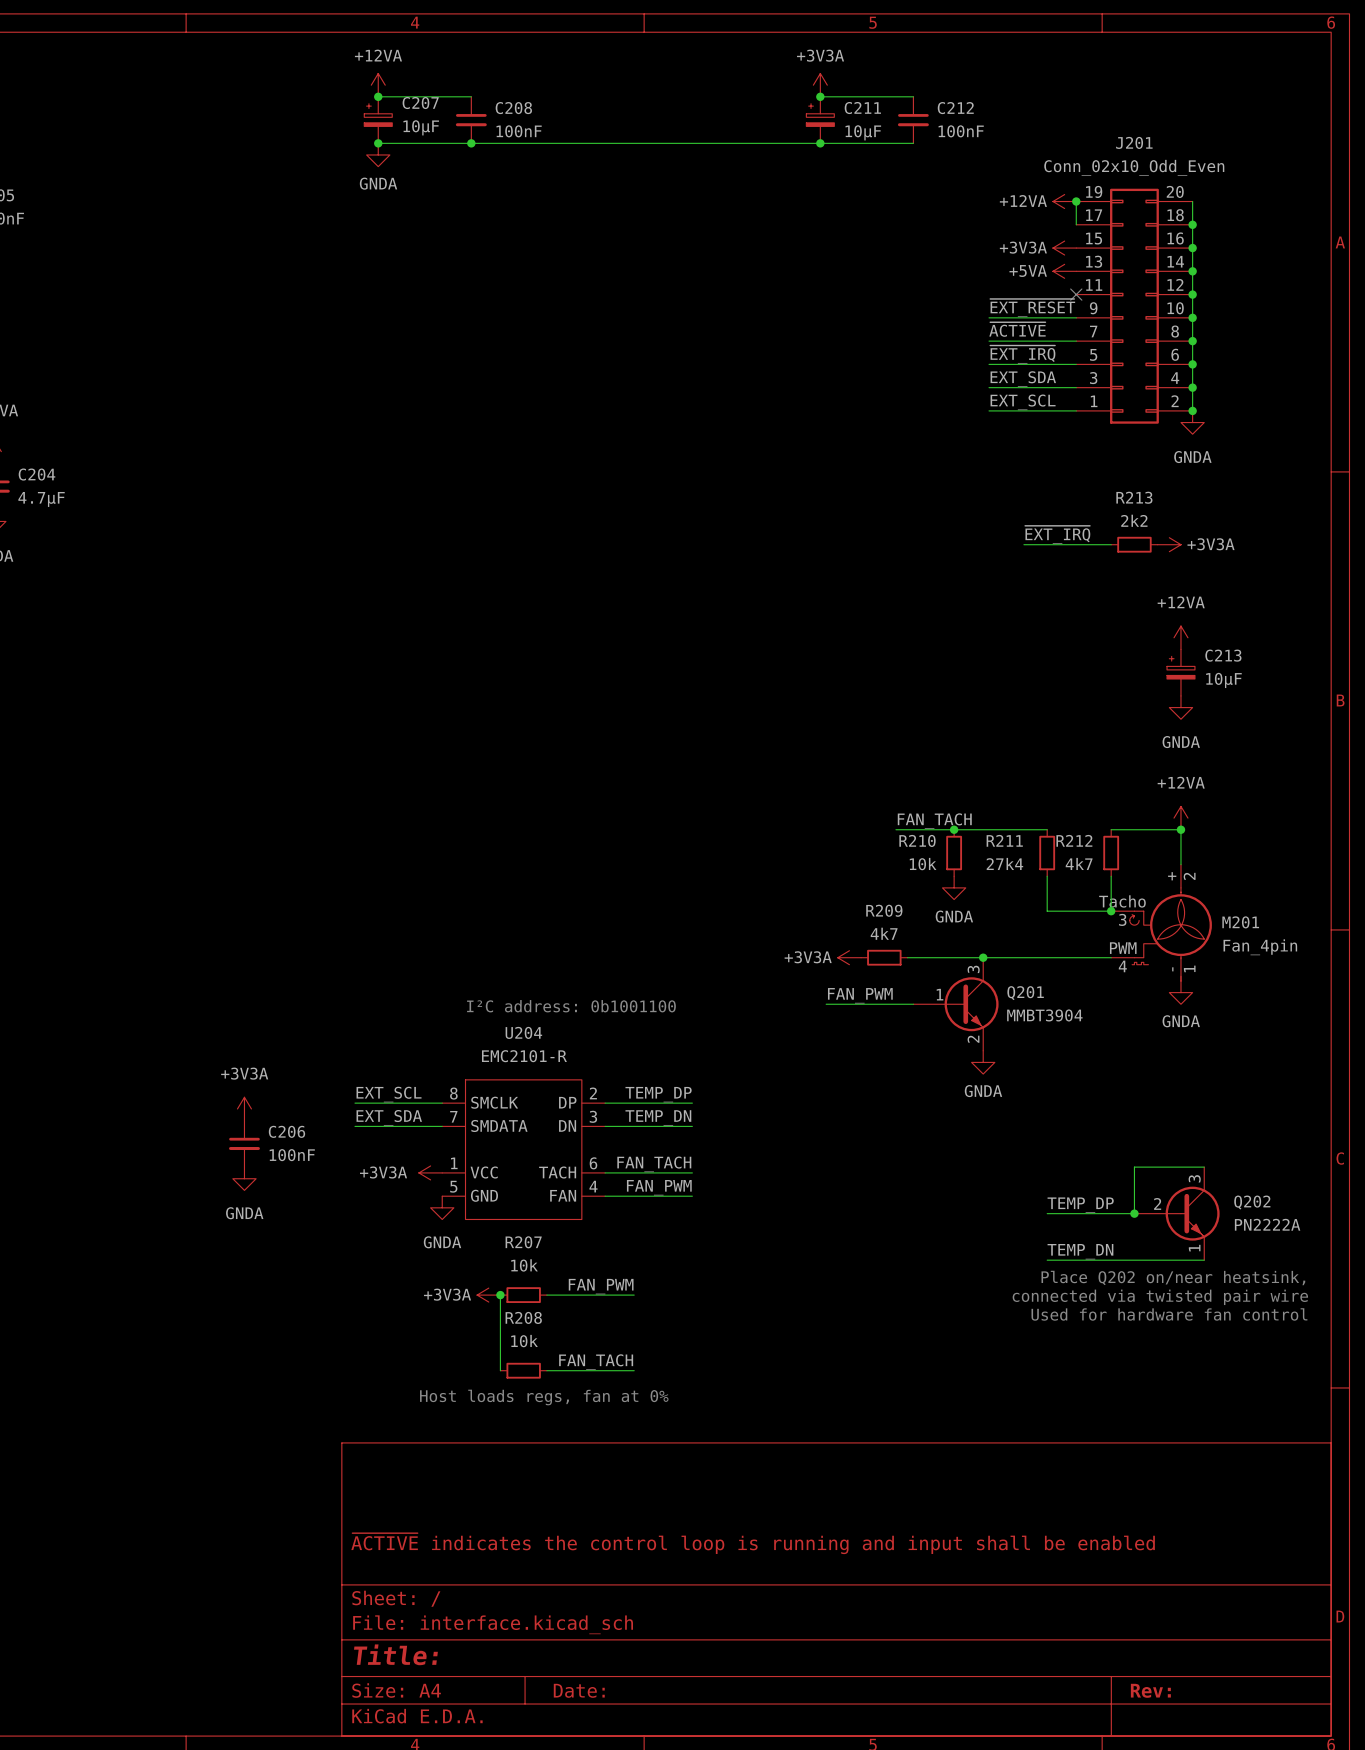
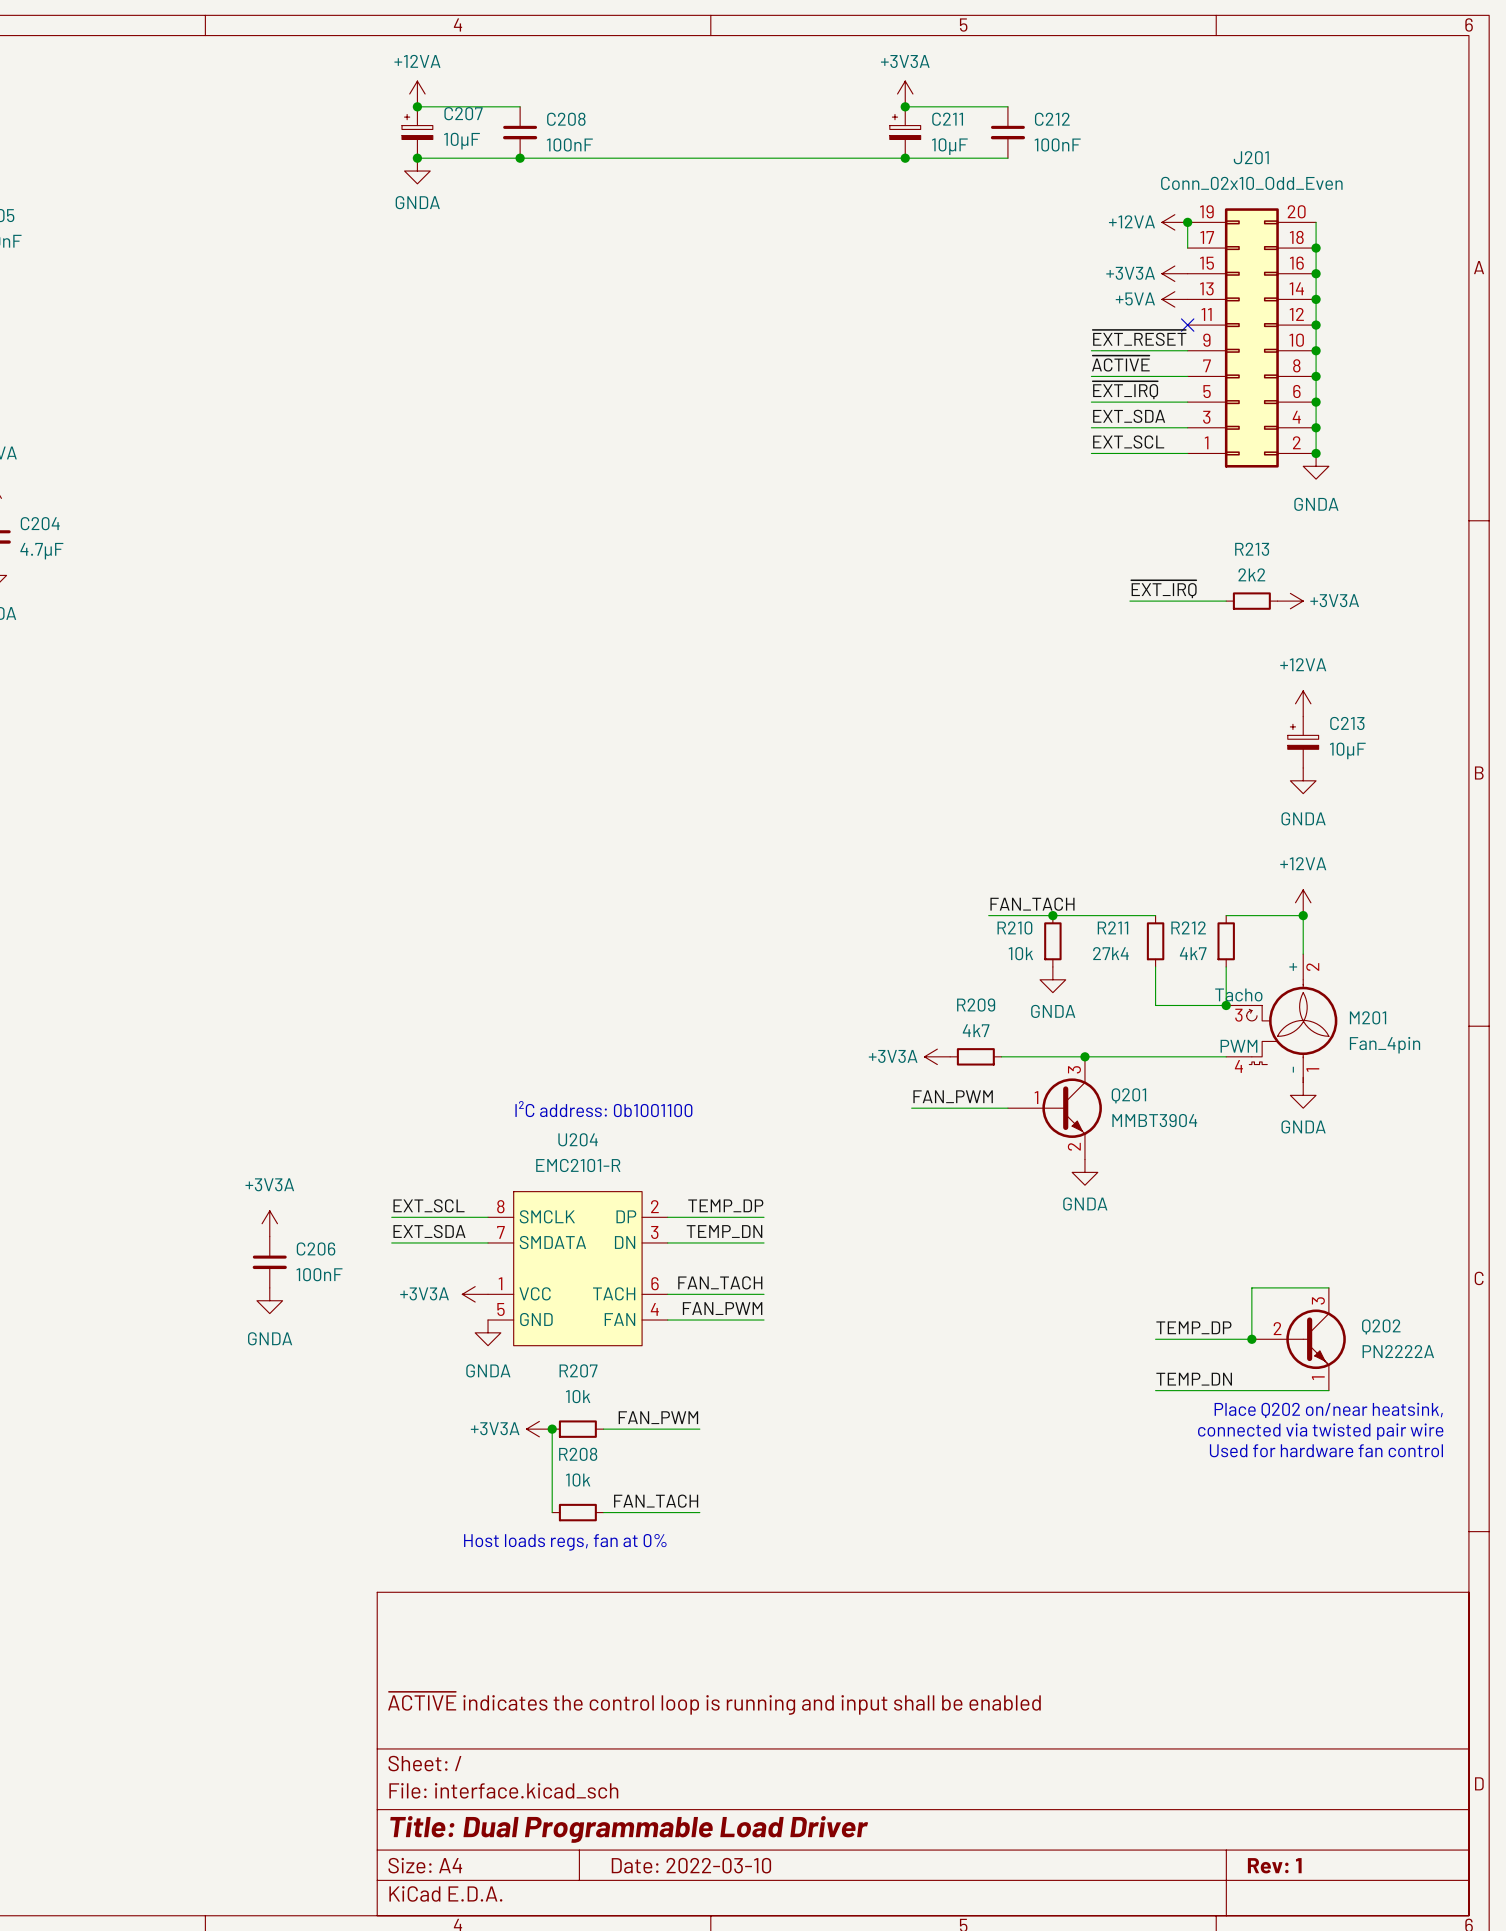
title block: Title: (395, 1654) -> Title: Dual Programmable Load Driver (629, 1829)
title block: Date: (579, 1690) -> Date: 2022-03-10 (691, 1865)
title block: Rev: (1150, 1690) -> Rev: 1 (1274, 1865)

